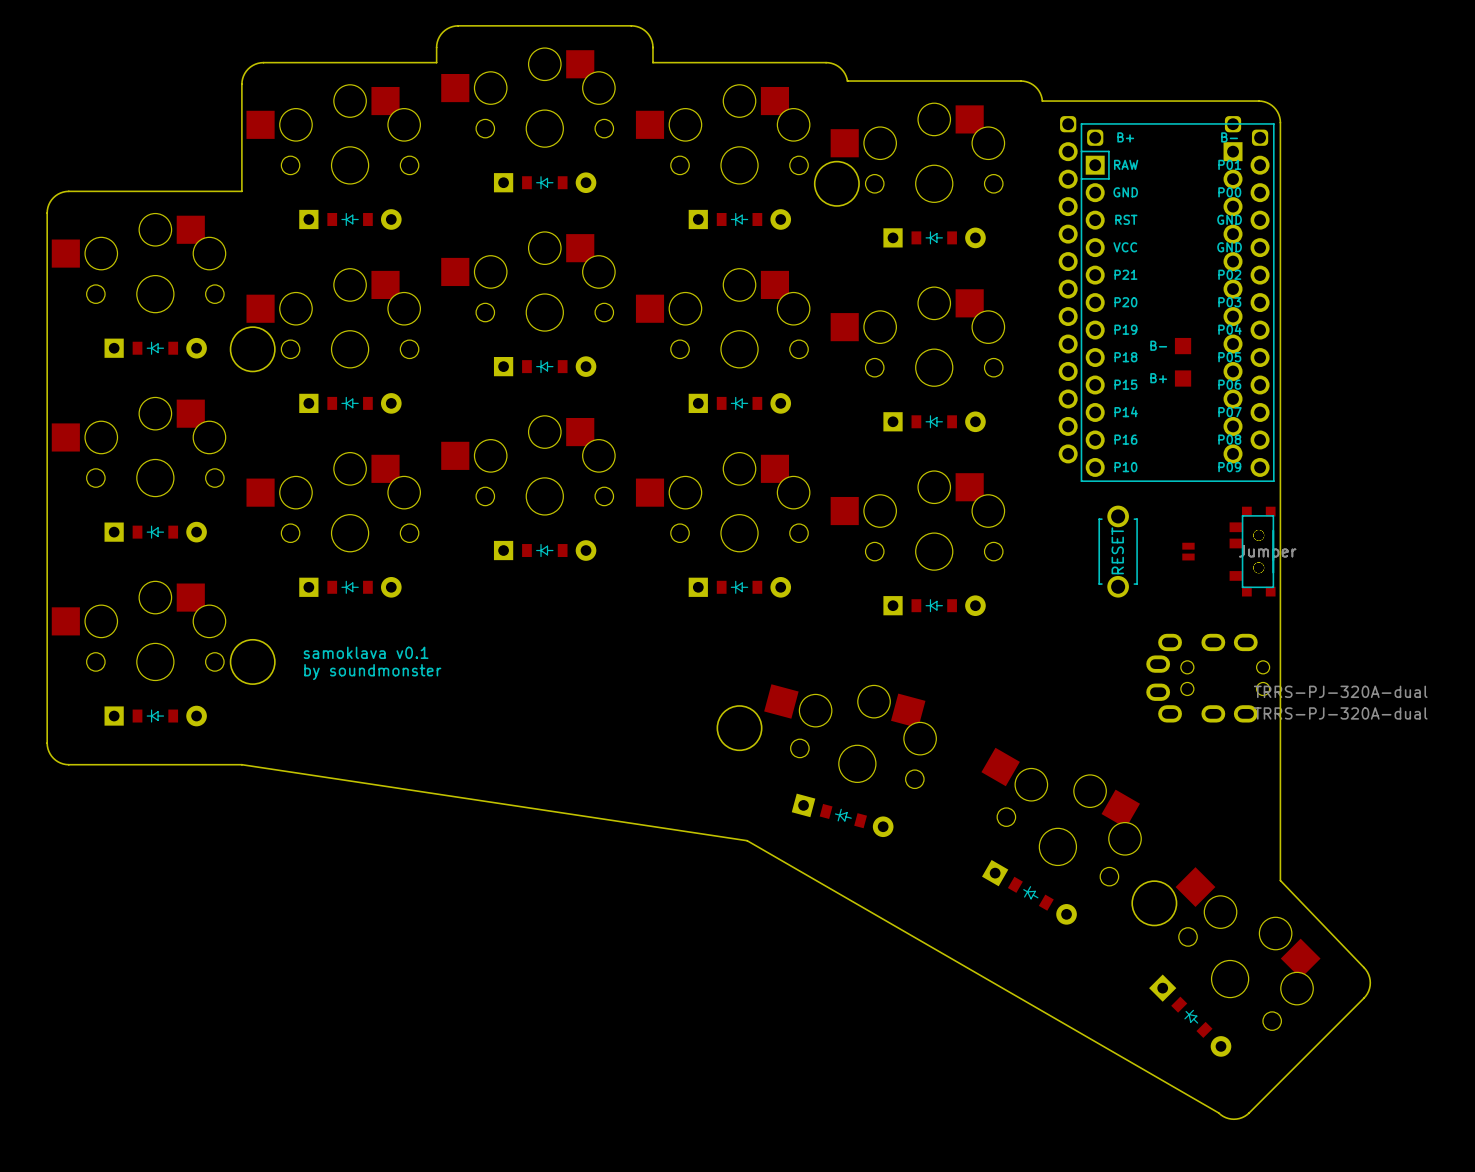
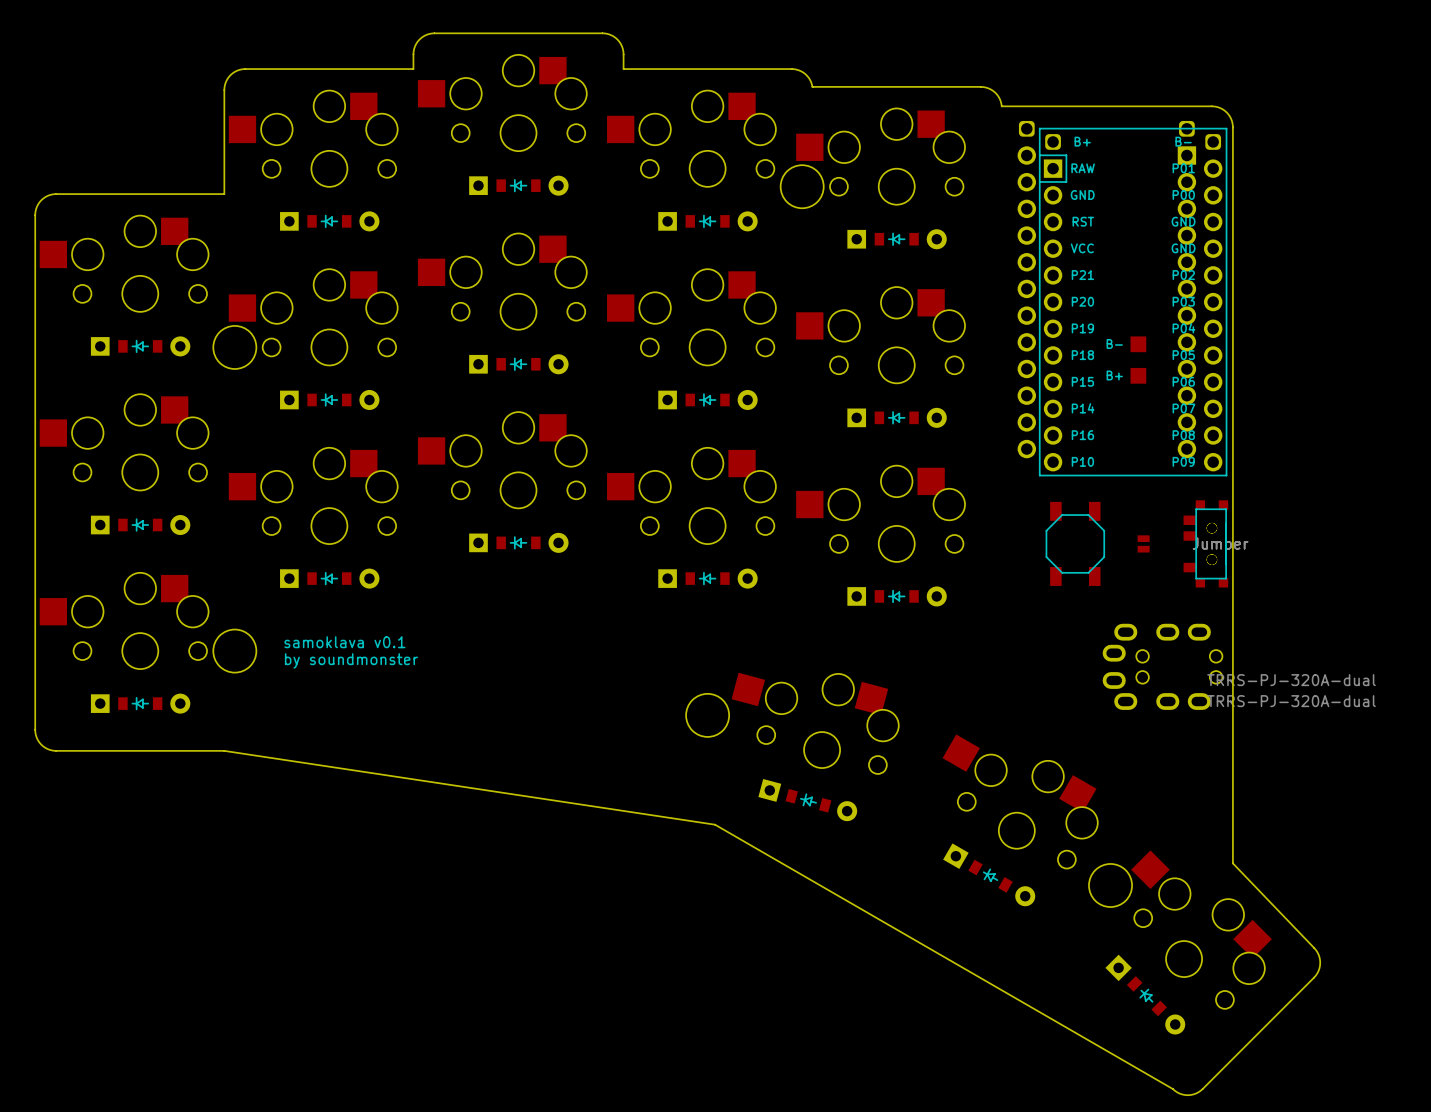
part footprint: [1098, 505, 1138, 598] -> [1045, 501, 1106, 586]

